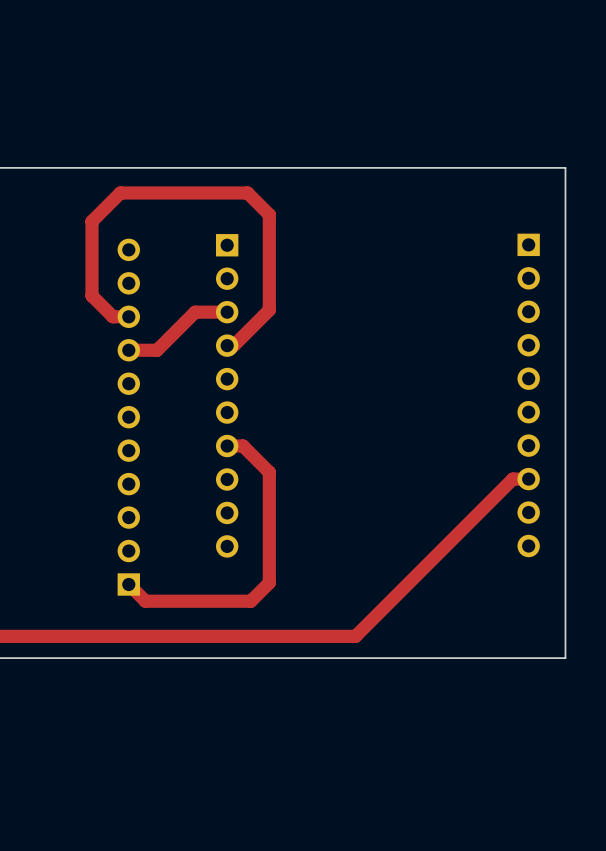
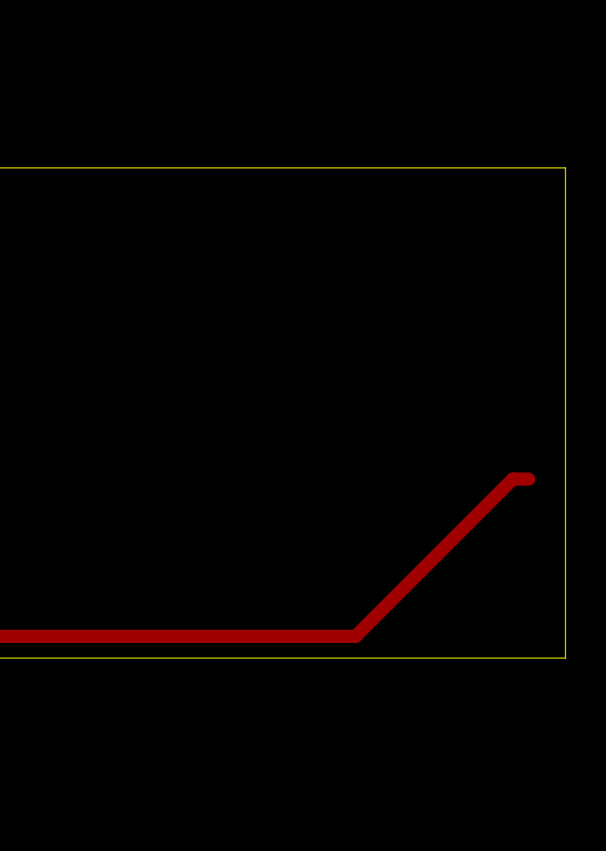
top track: (227, 312) (195, 312) (157, 350) (128, 350) -> none
top track: (128, 316) (112, 316) (91, 295) (91, 221) (120, 192) (247, 192) (269, 214) (269, 310) (233, 345) (227, 345) -> none
part: (227, 395) -> none
part: (528, 395) -> none
part: (128, 417) -> none
top track: (227, 446) (243, 446) (269, 472) (269, 582) (250, 601) (145, 601) (128, 584) -> none

